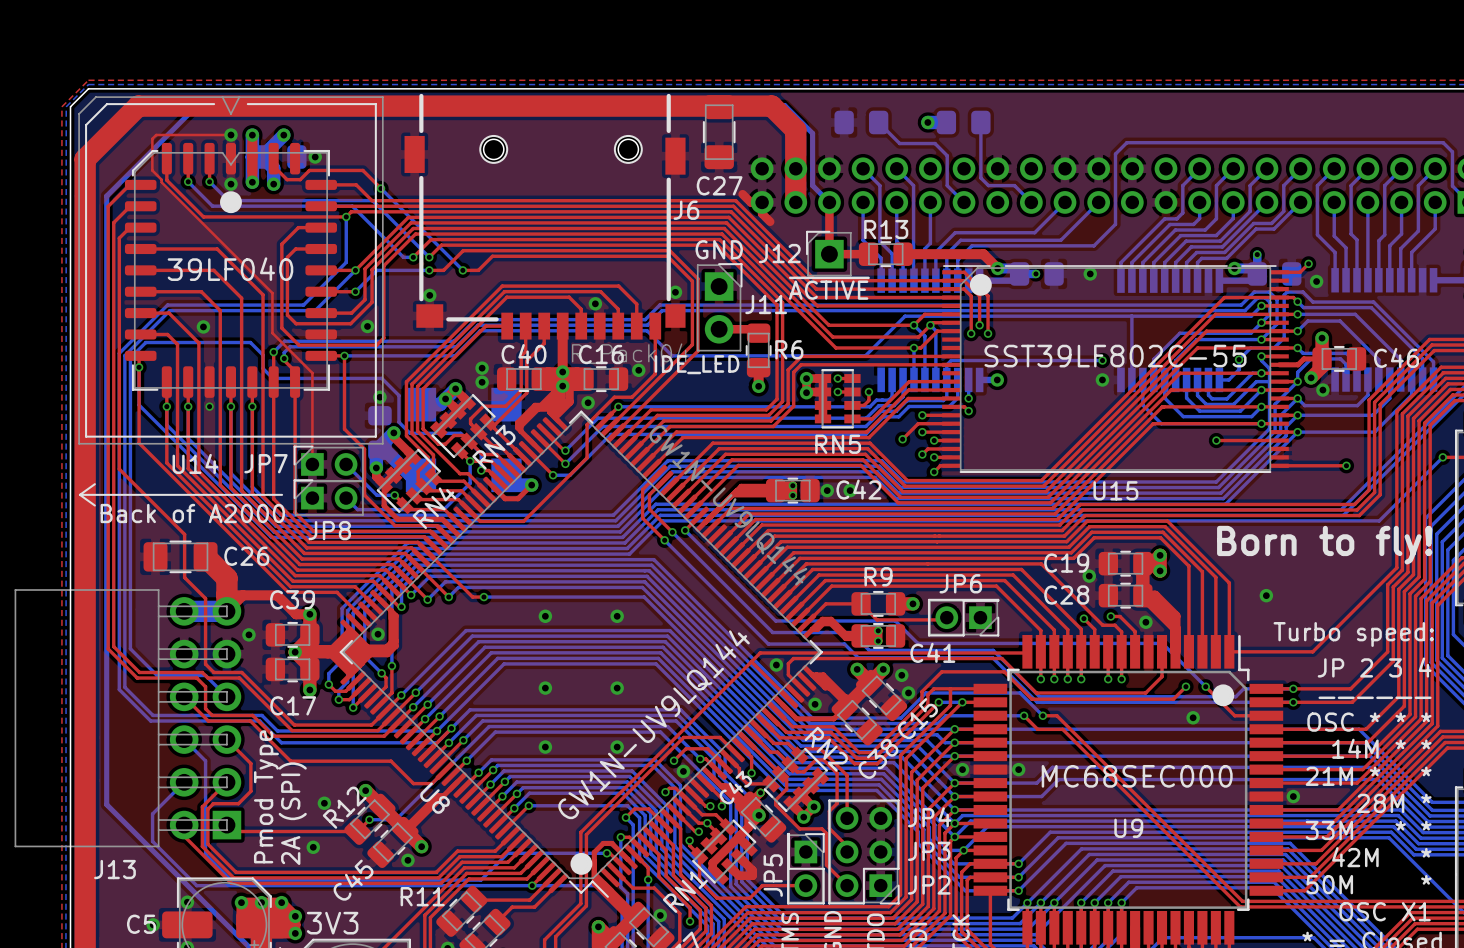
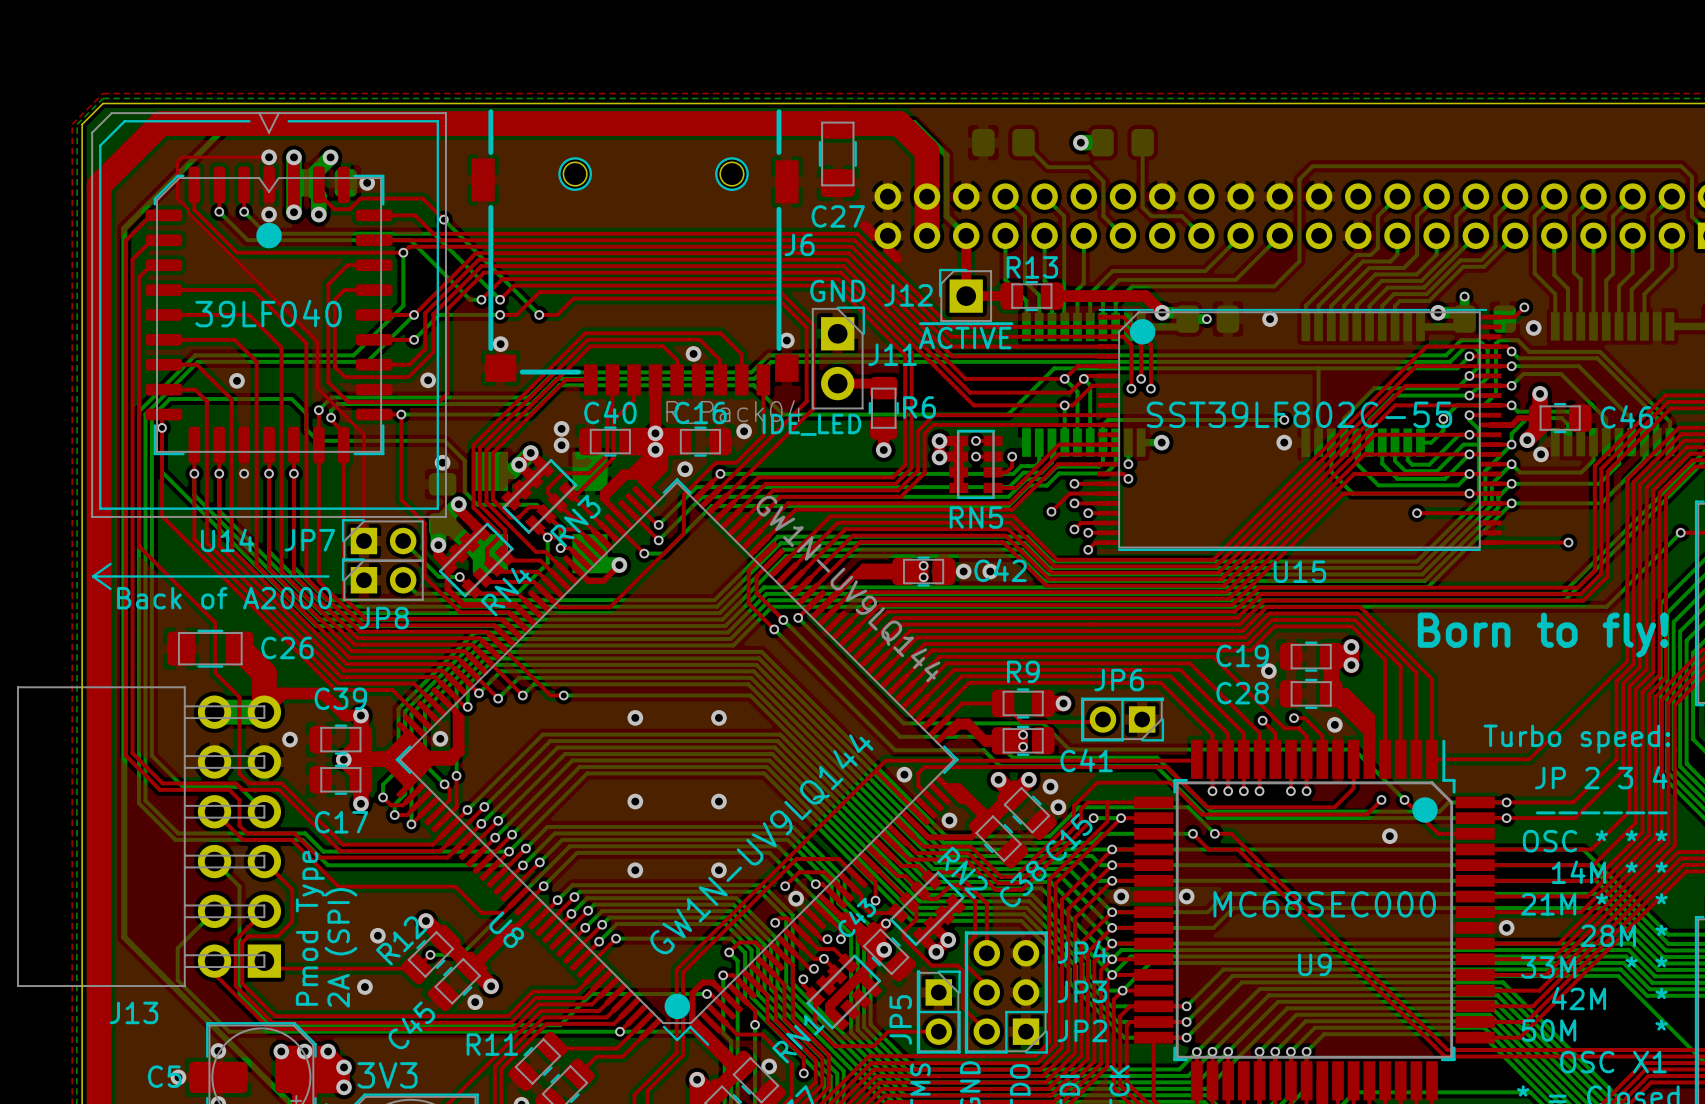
via: (1266, 595) -> none
top track: (739, 857) (752, 870) (752, 875) (738, 875) (729, 866) -> none

